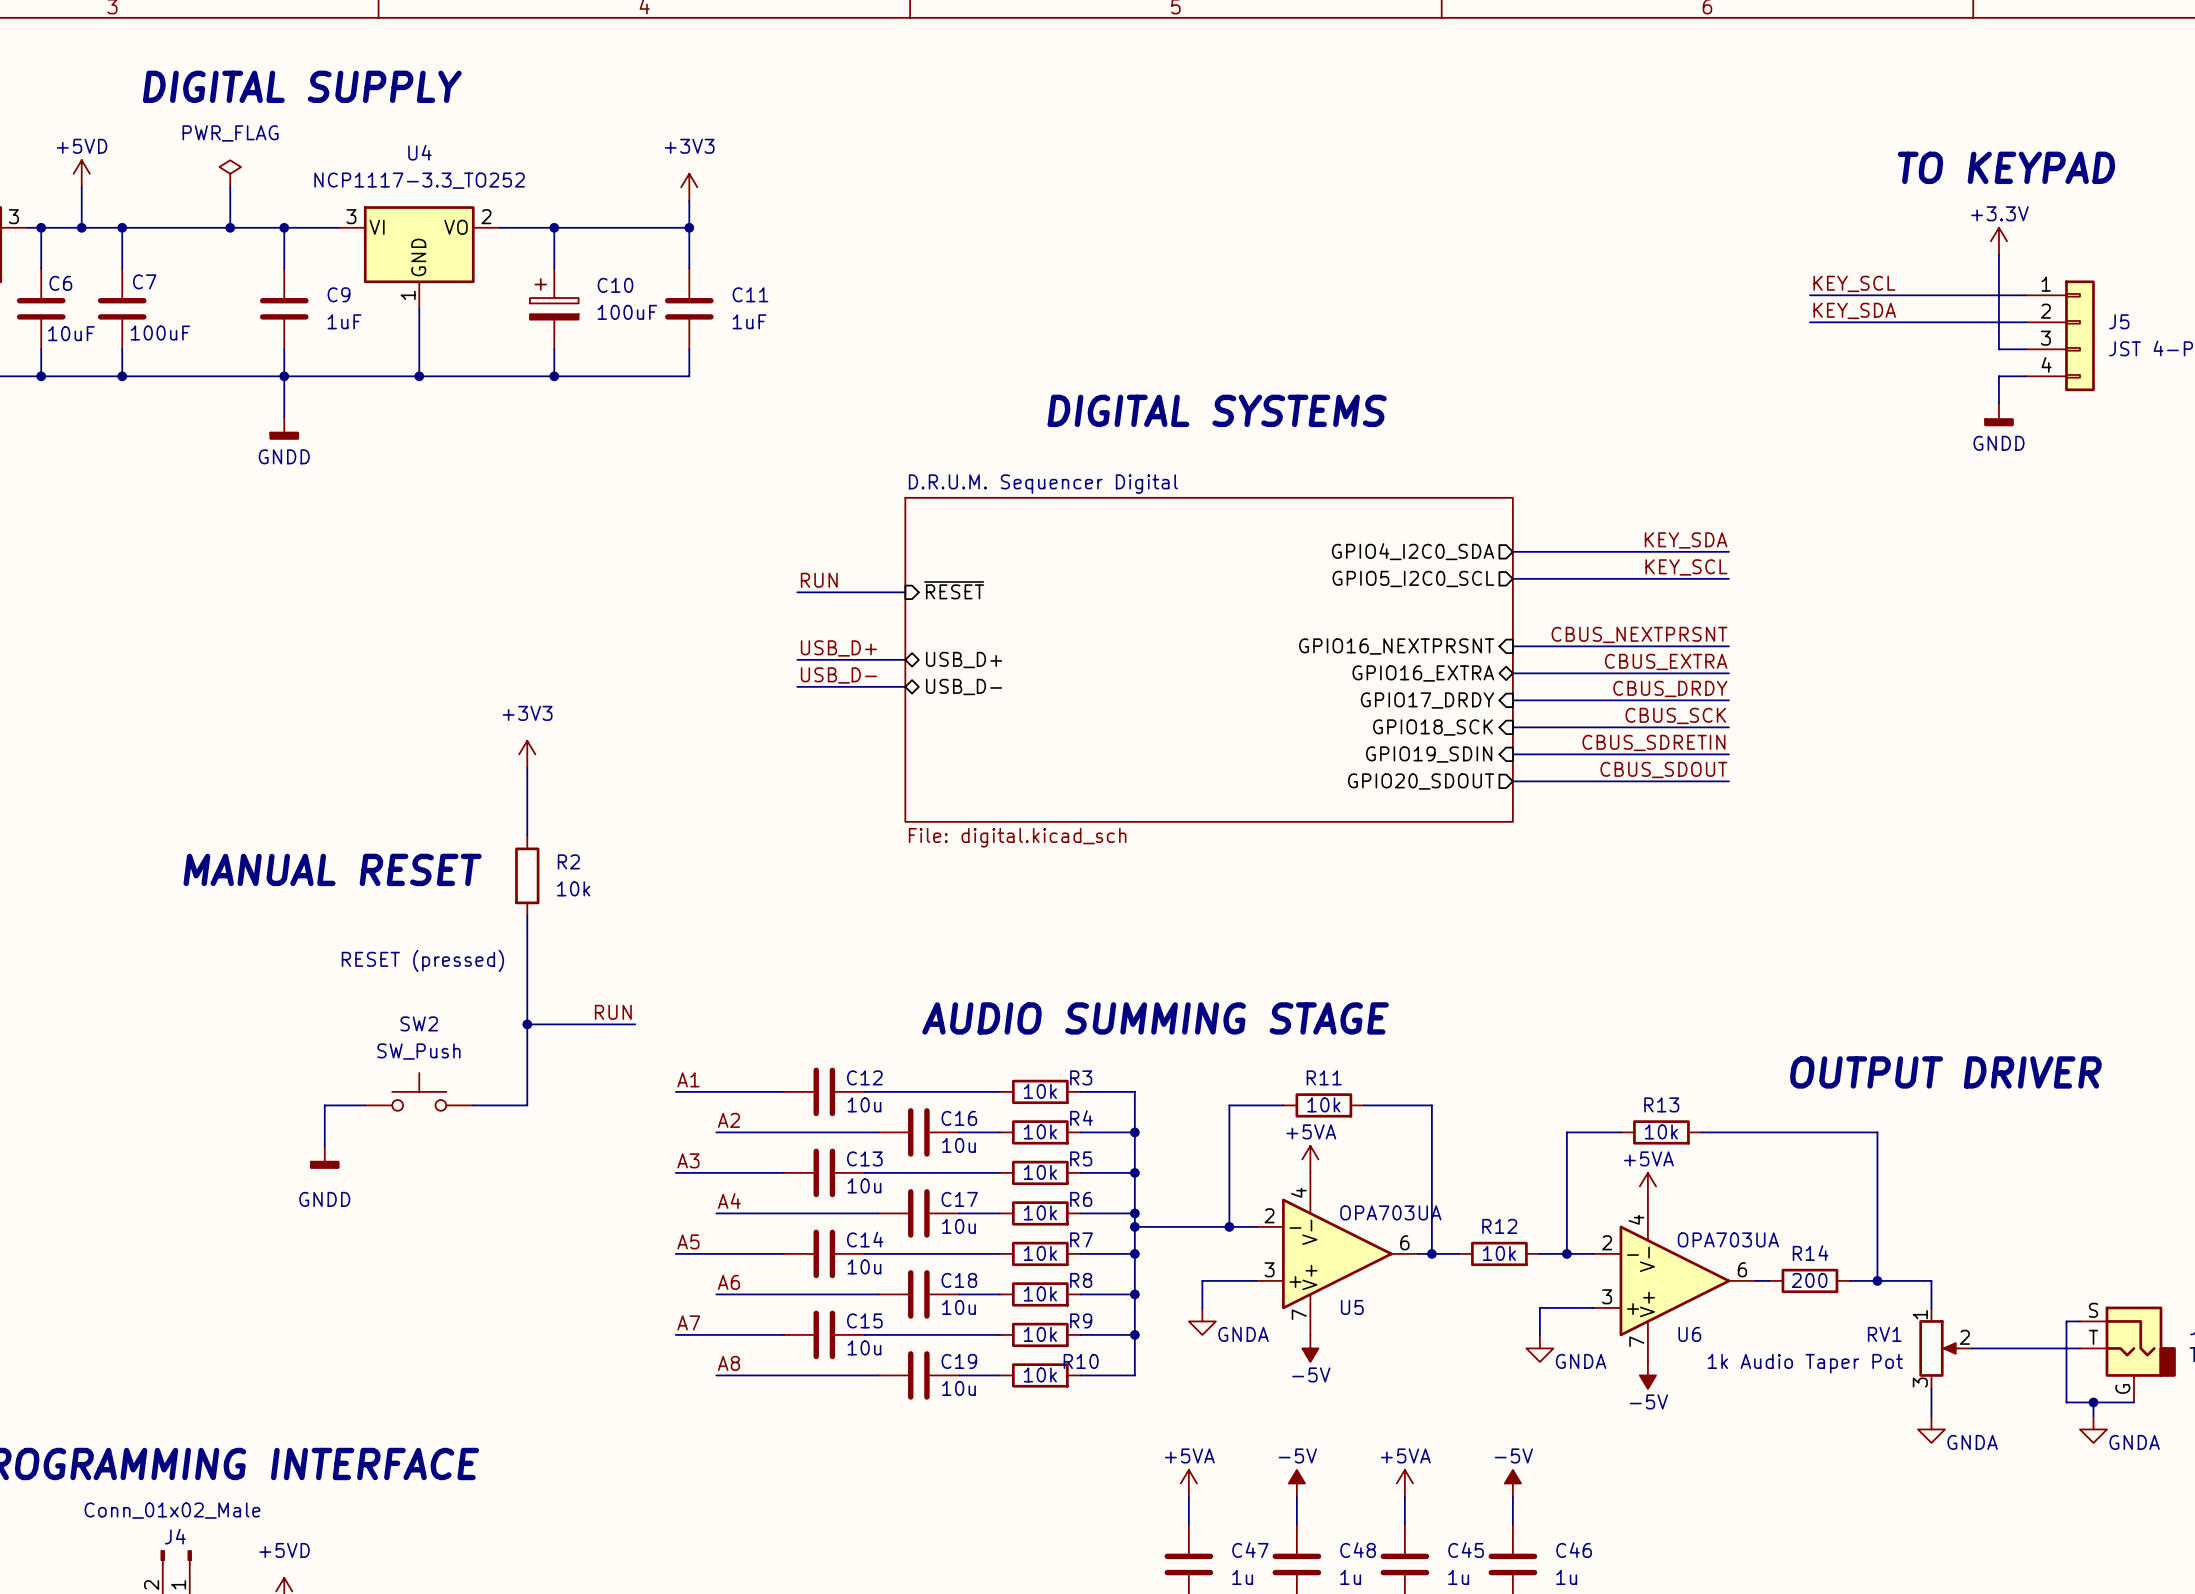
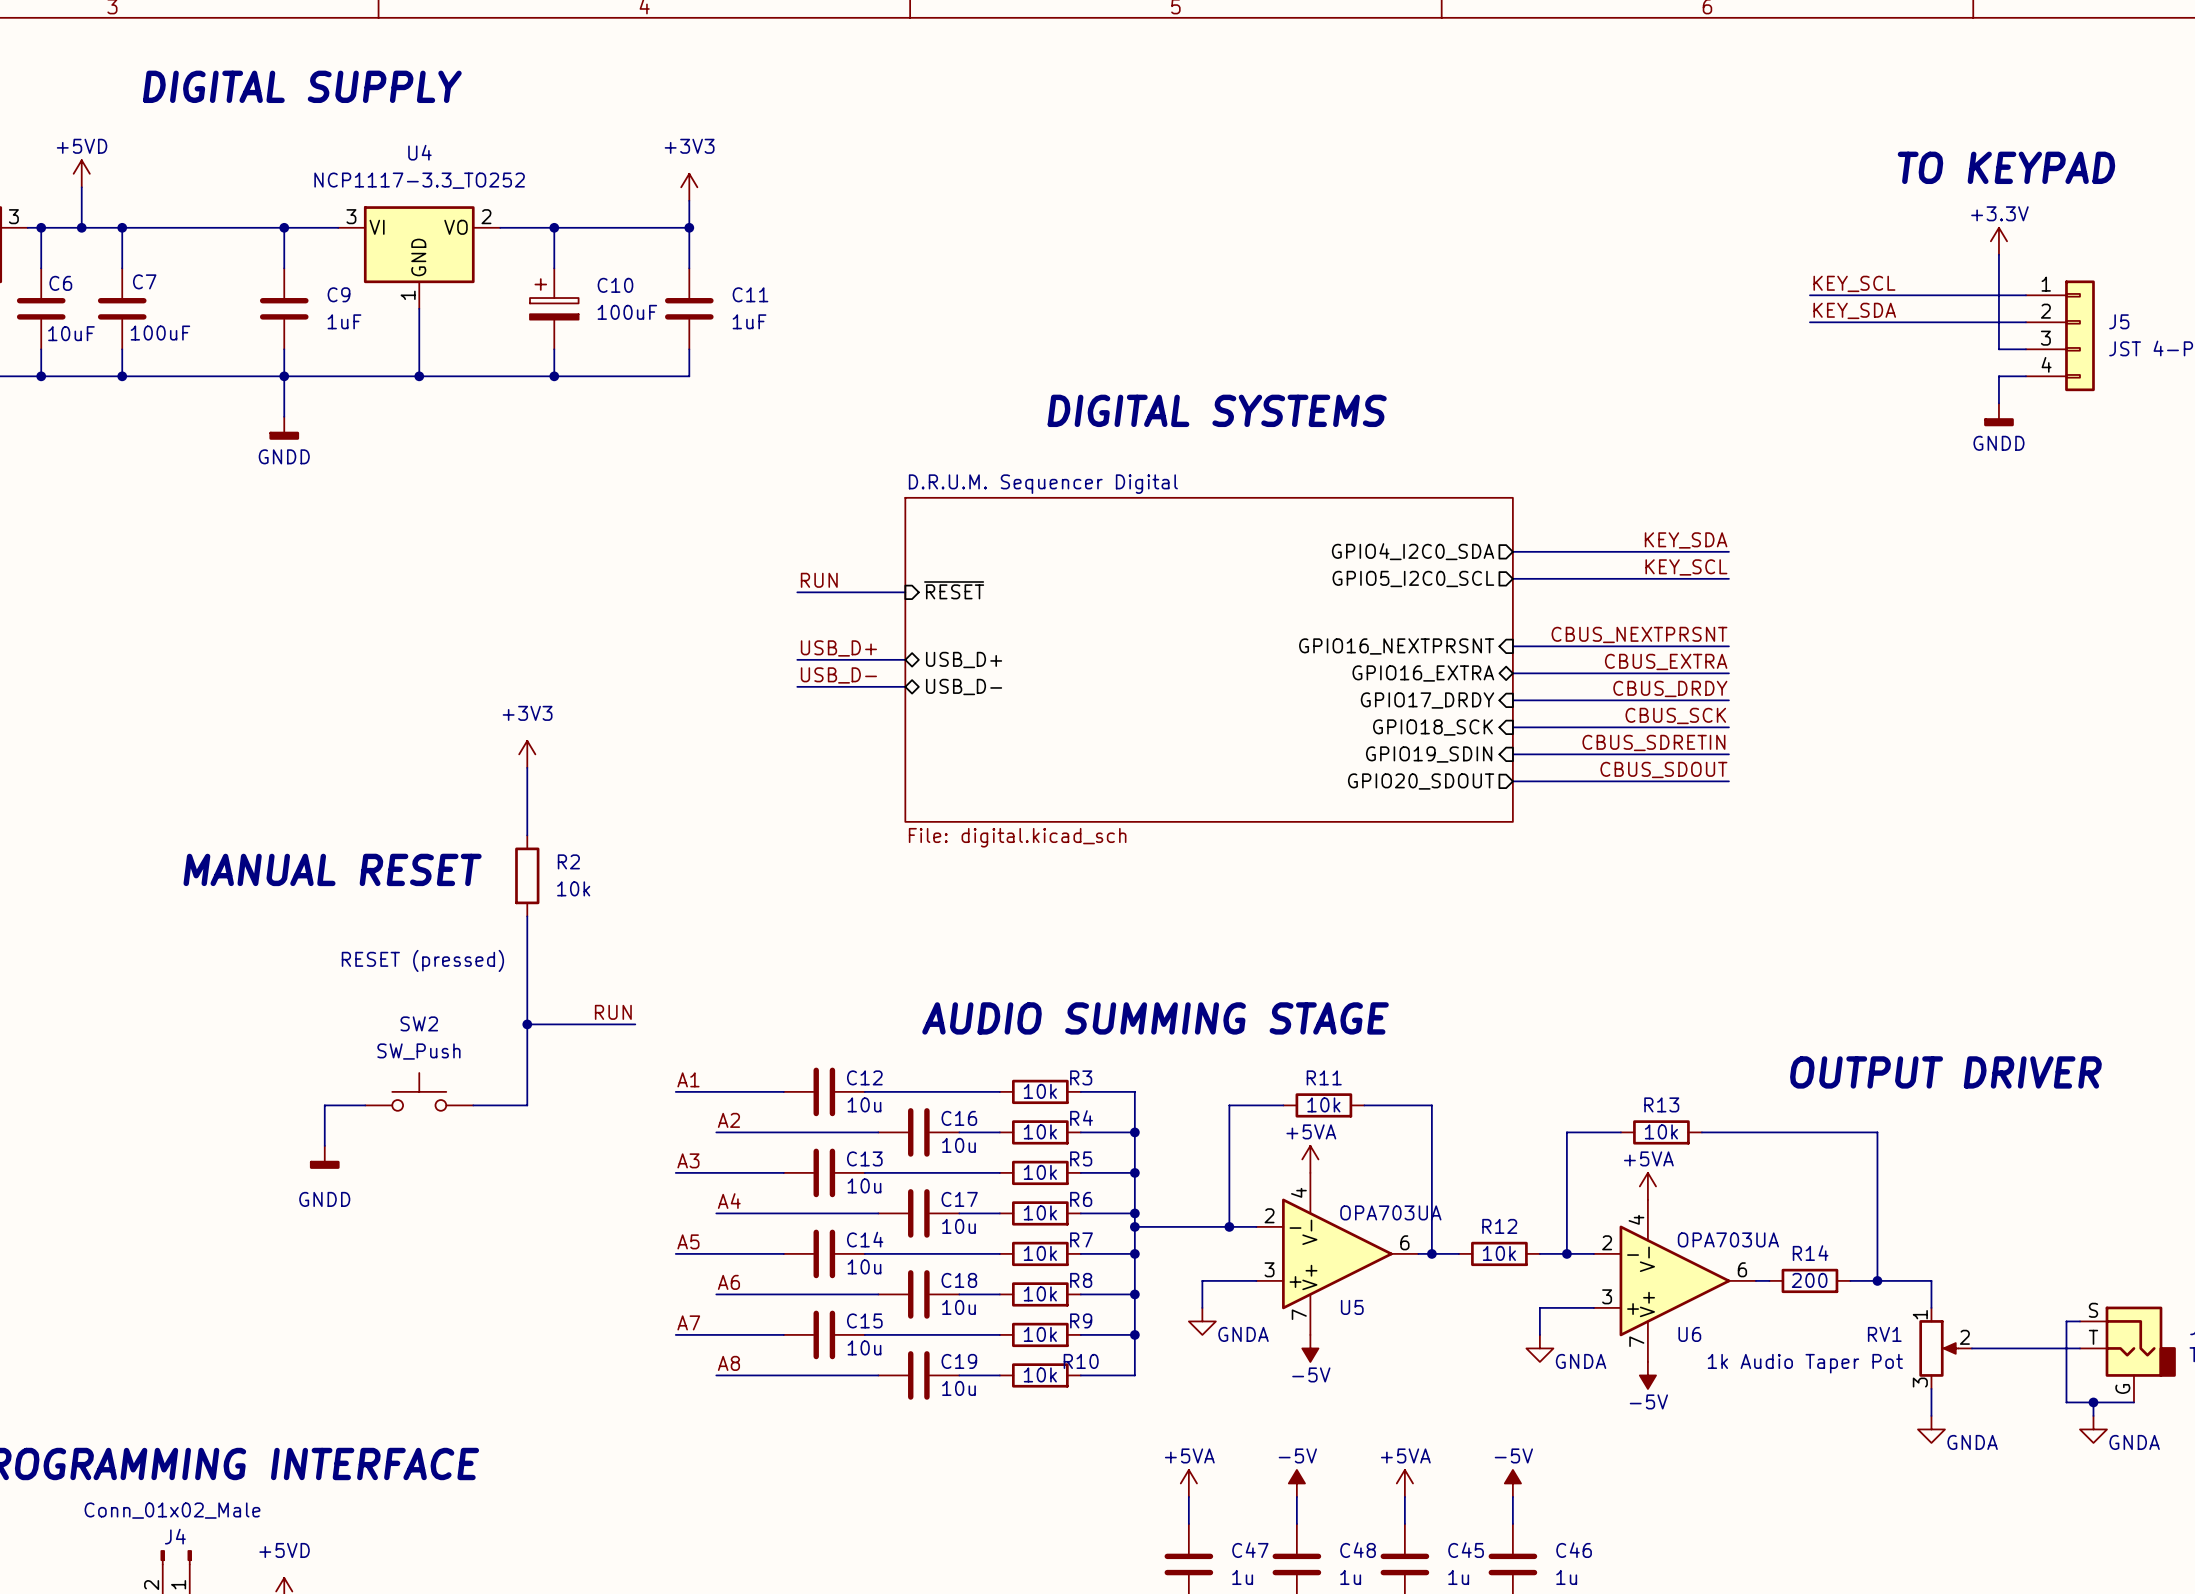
power symbol: PWR_FLAG (230, 173) -> none
wire: (230, 187) (230, 227) -> none
junction: (230, 227) -> none

